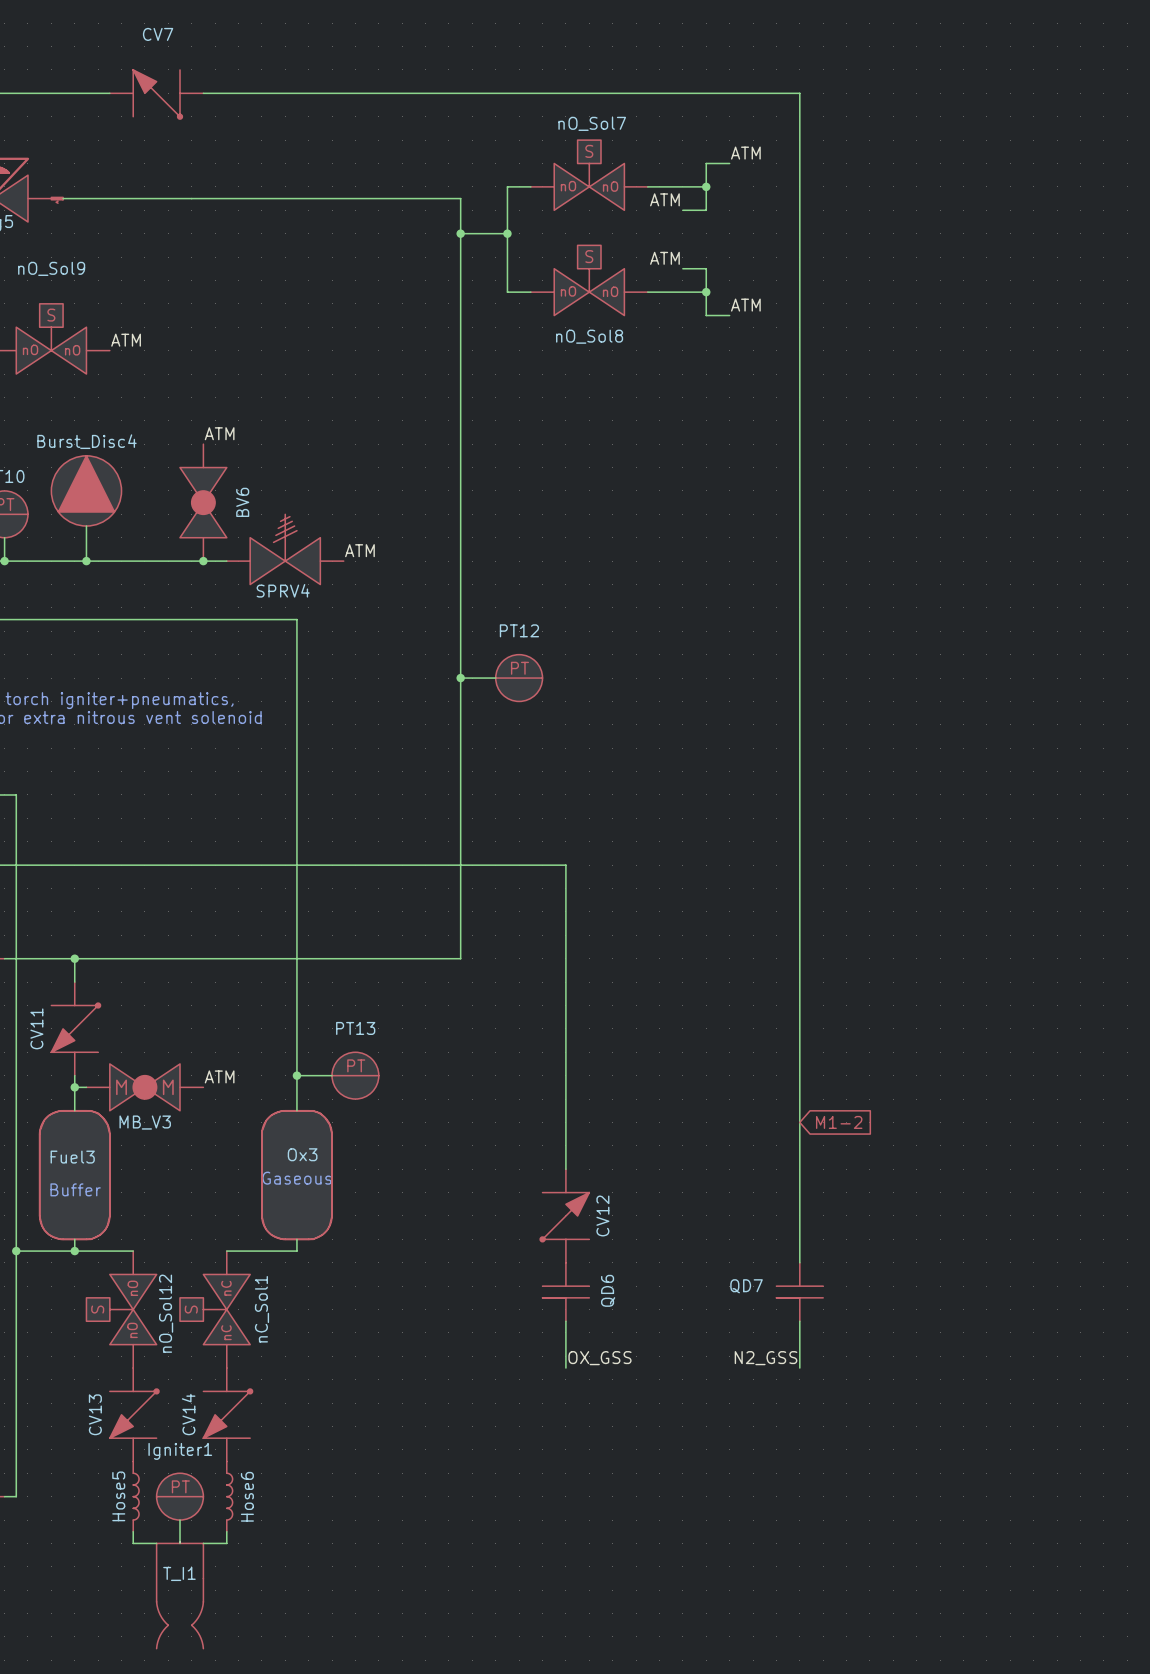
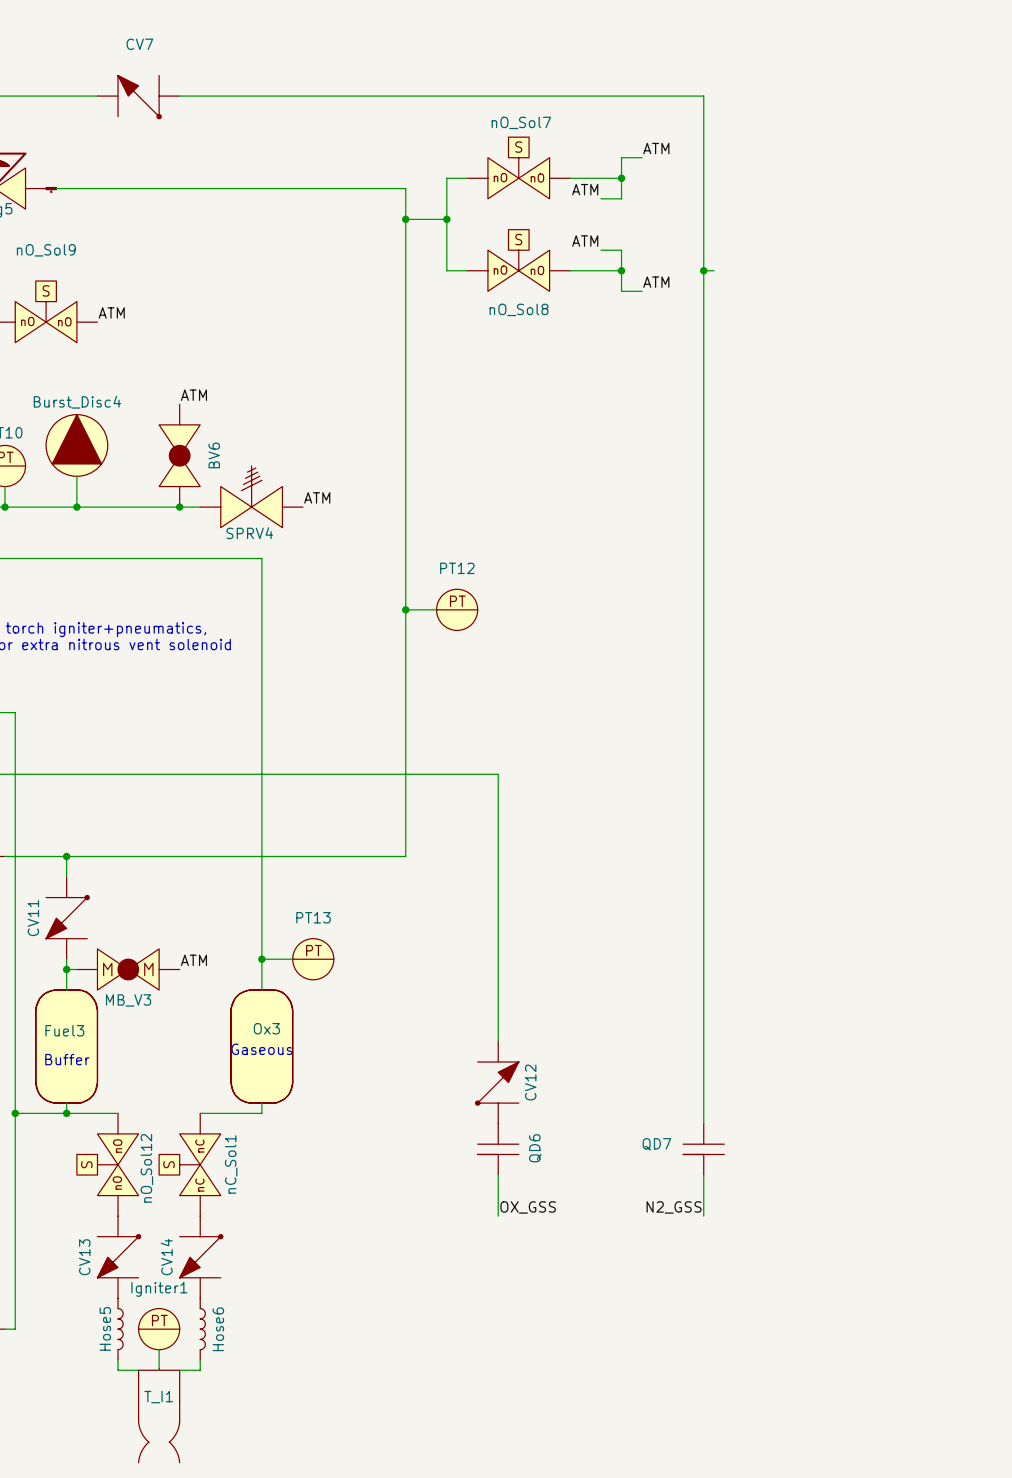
wire: none -> (703, 270) (714, 270)
junction: none -> (703, 270)
global label: M1-2 (839, 1122) -> none

